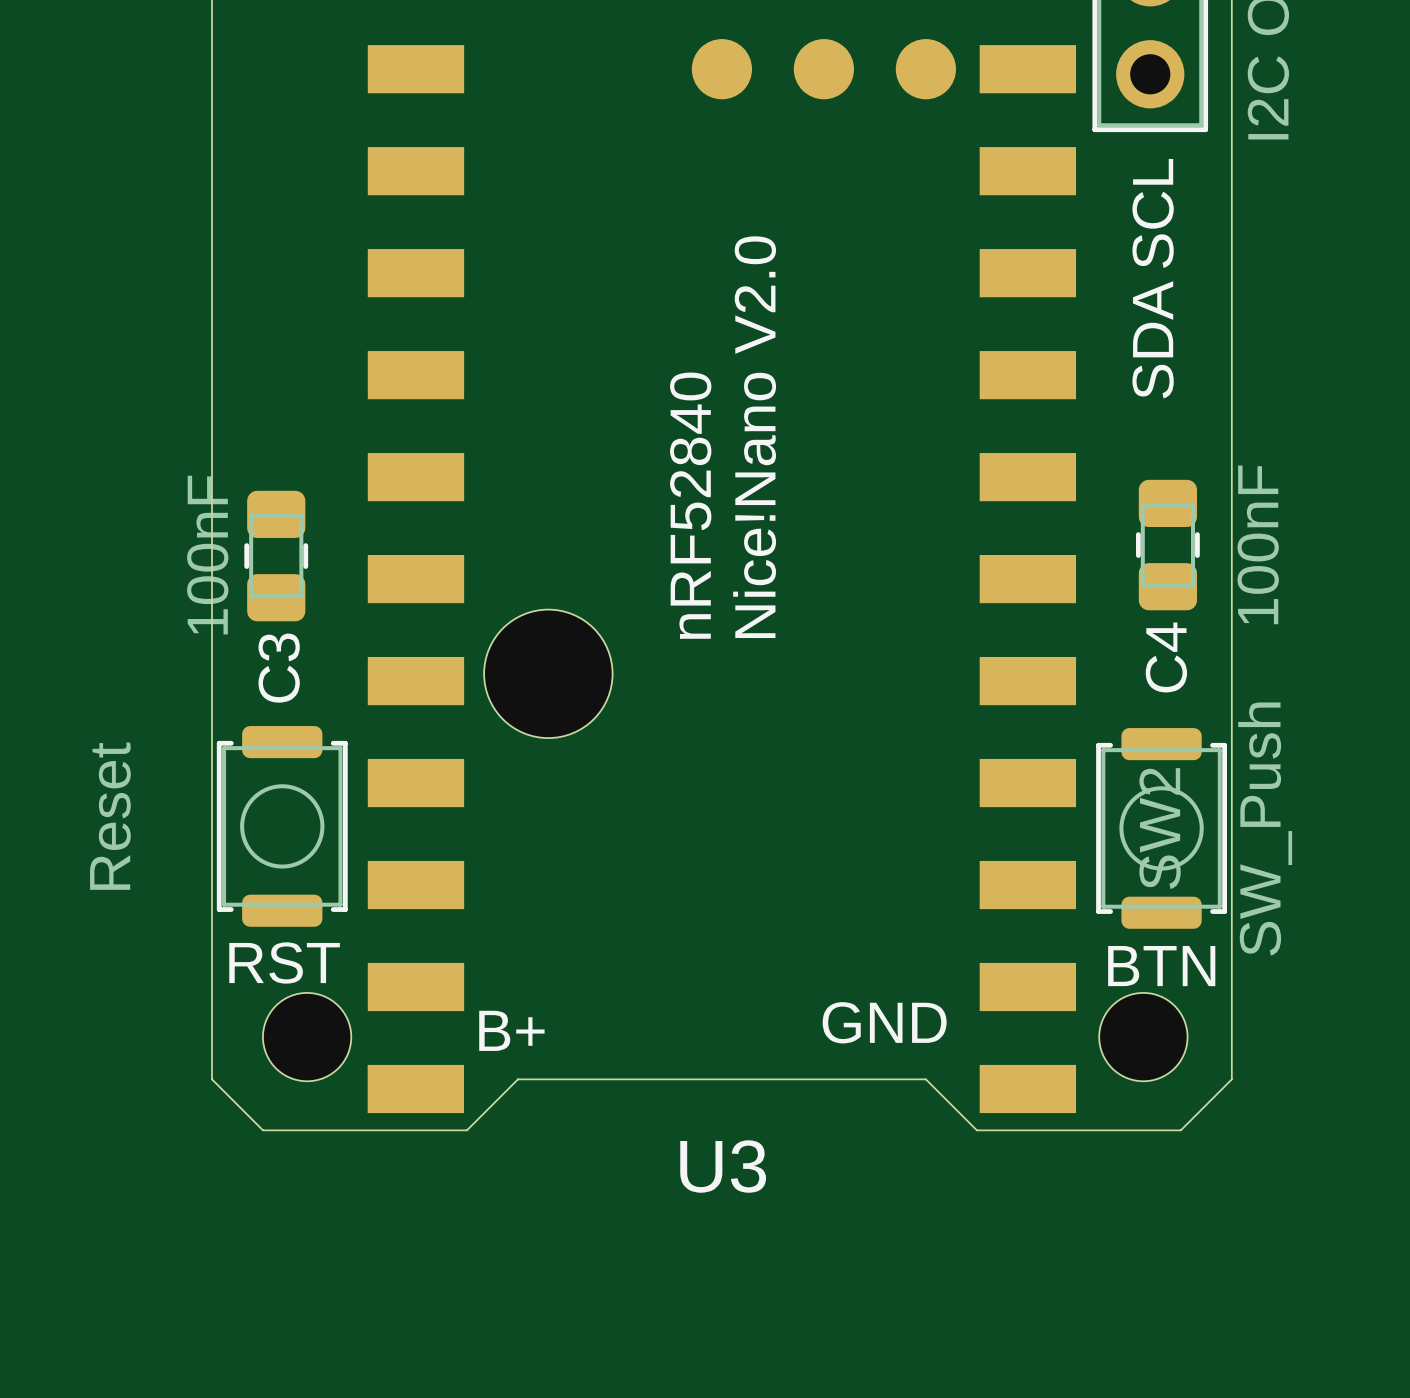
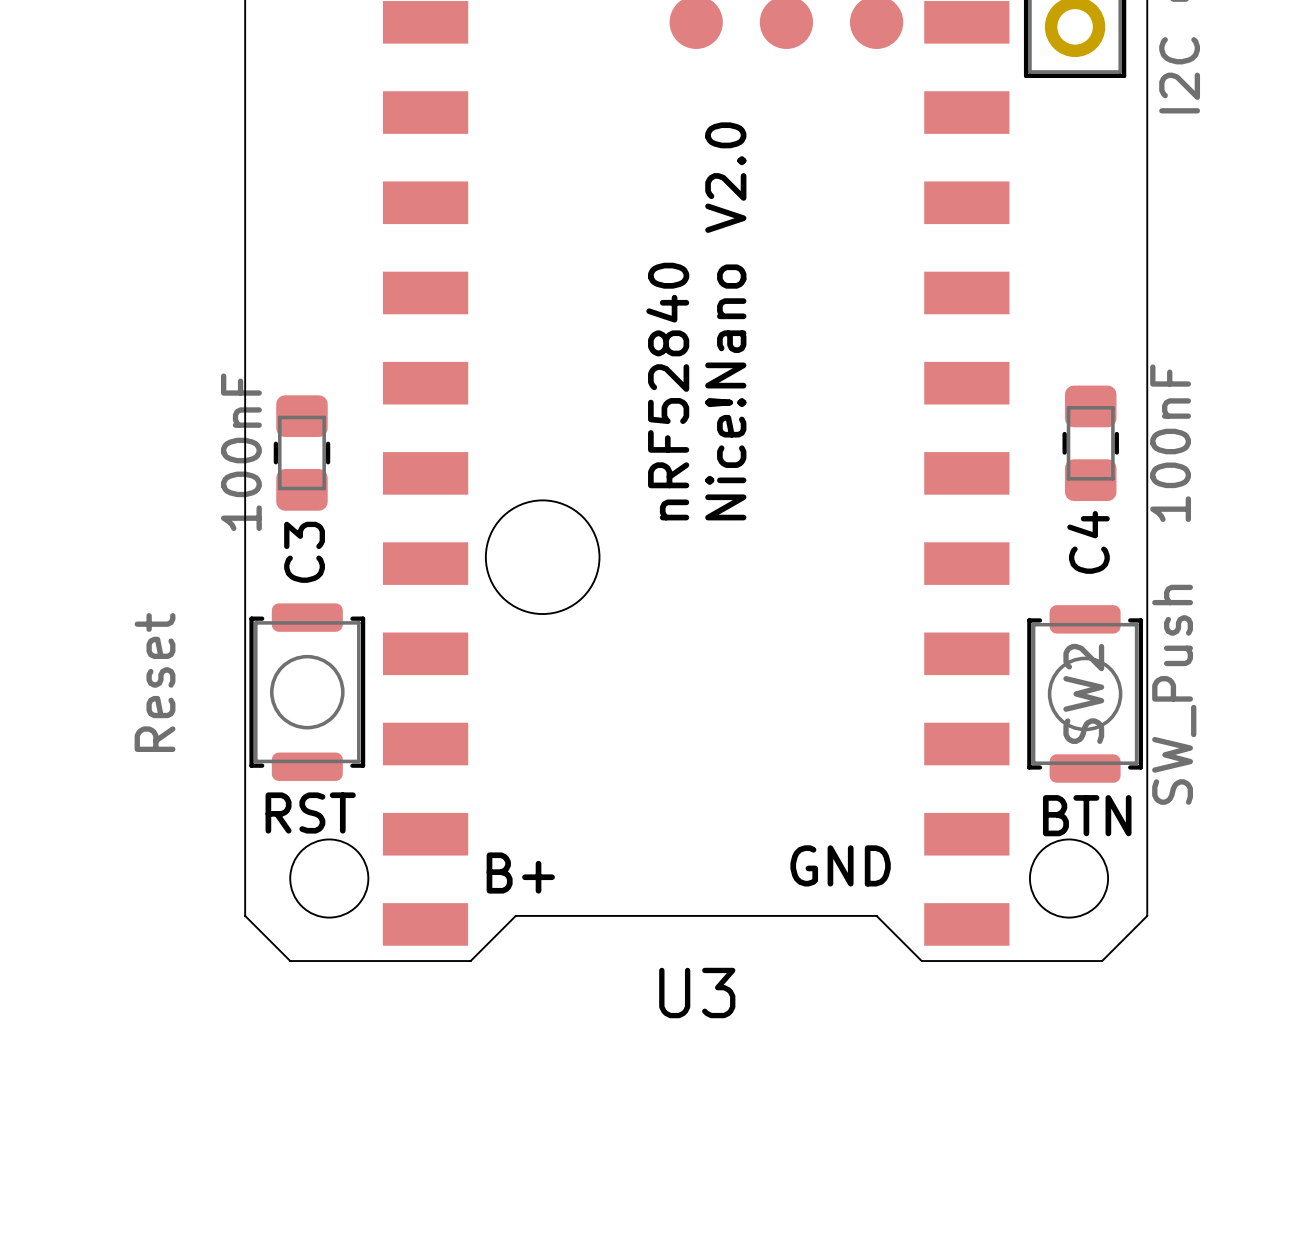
text: SCL (1153, 213) -> none
text: SDA (1153, 339) -> none

